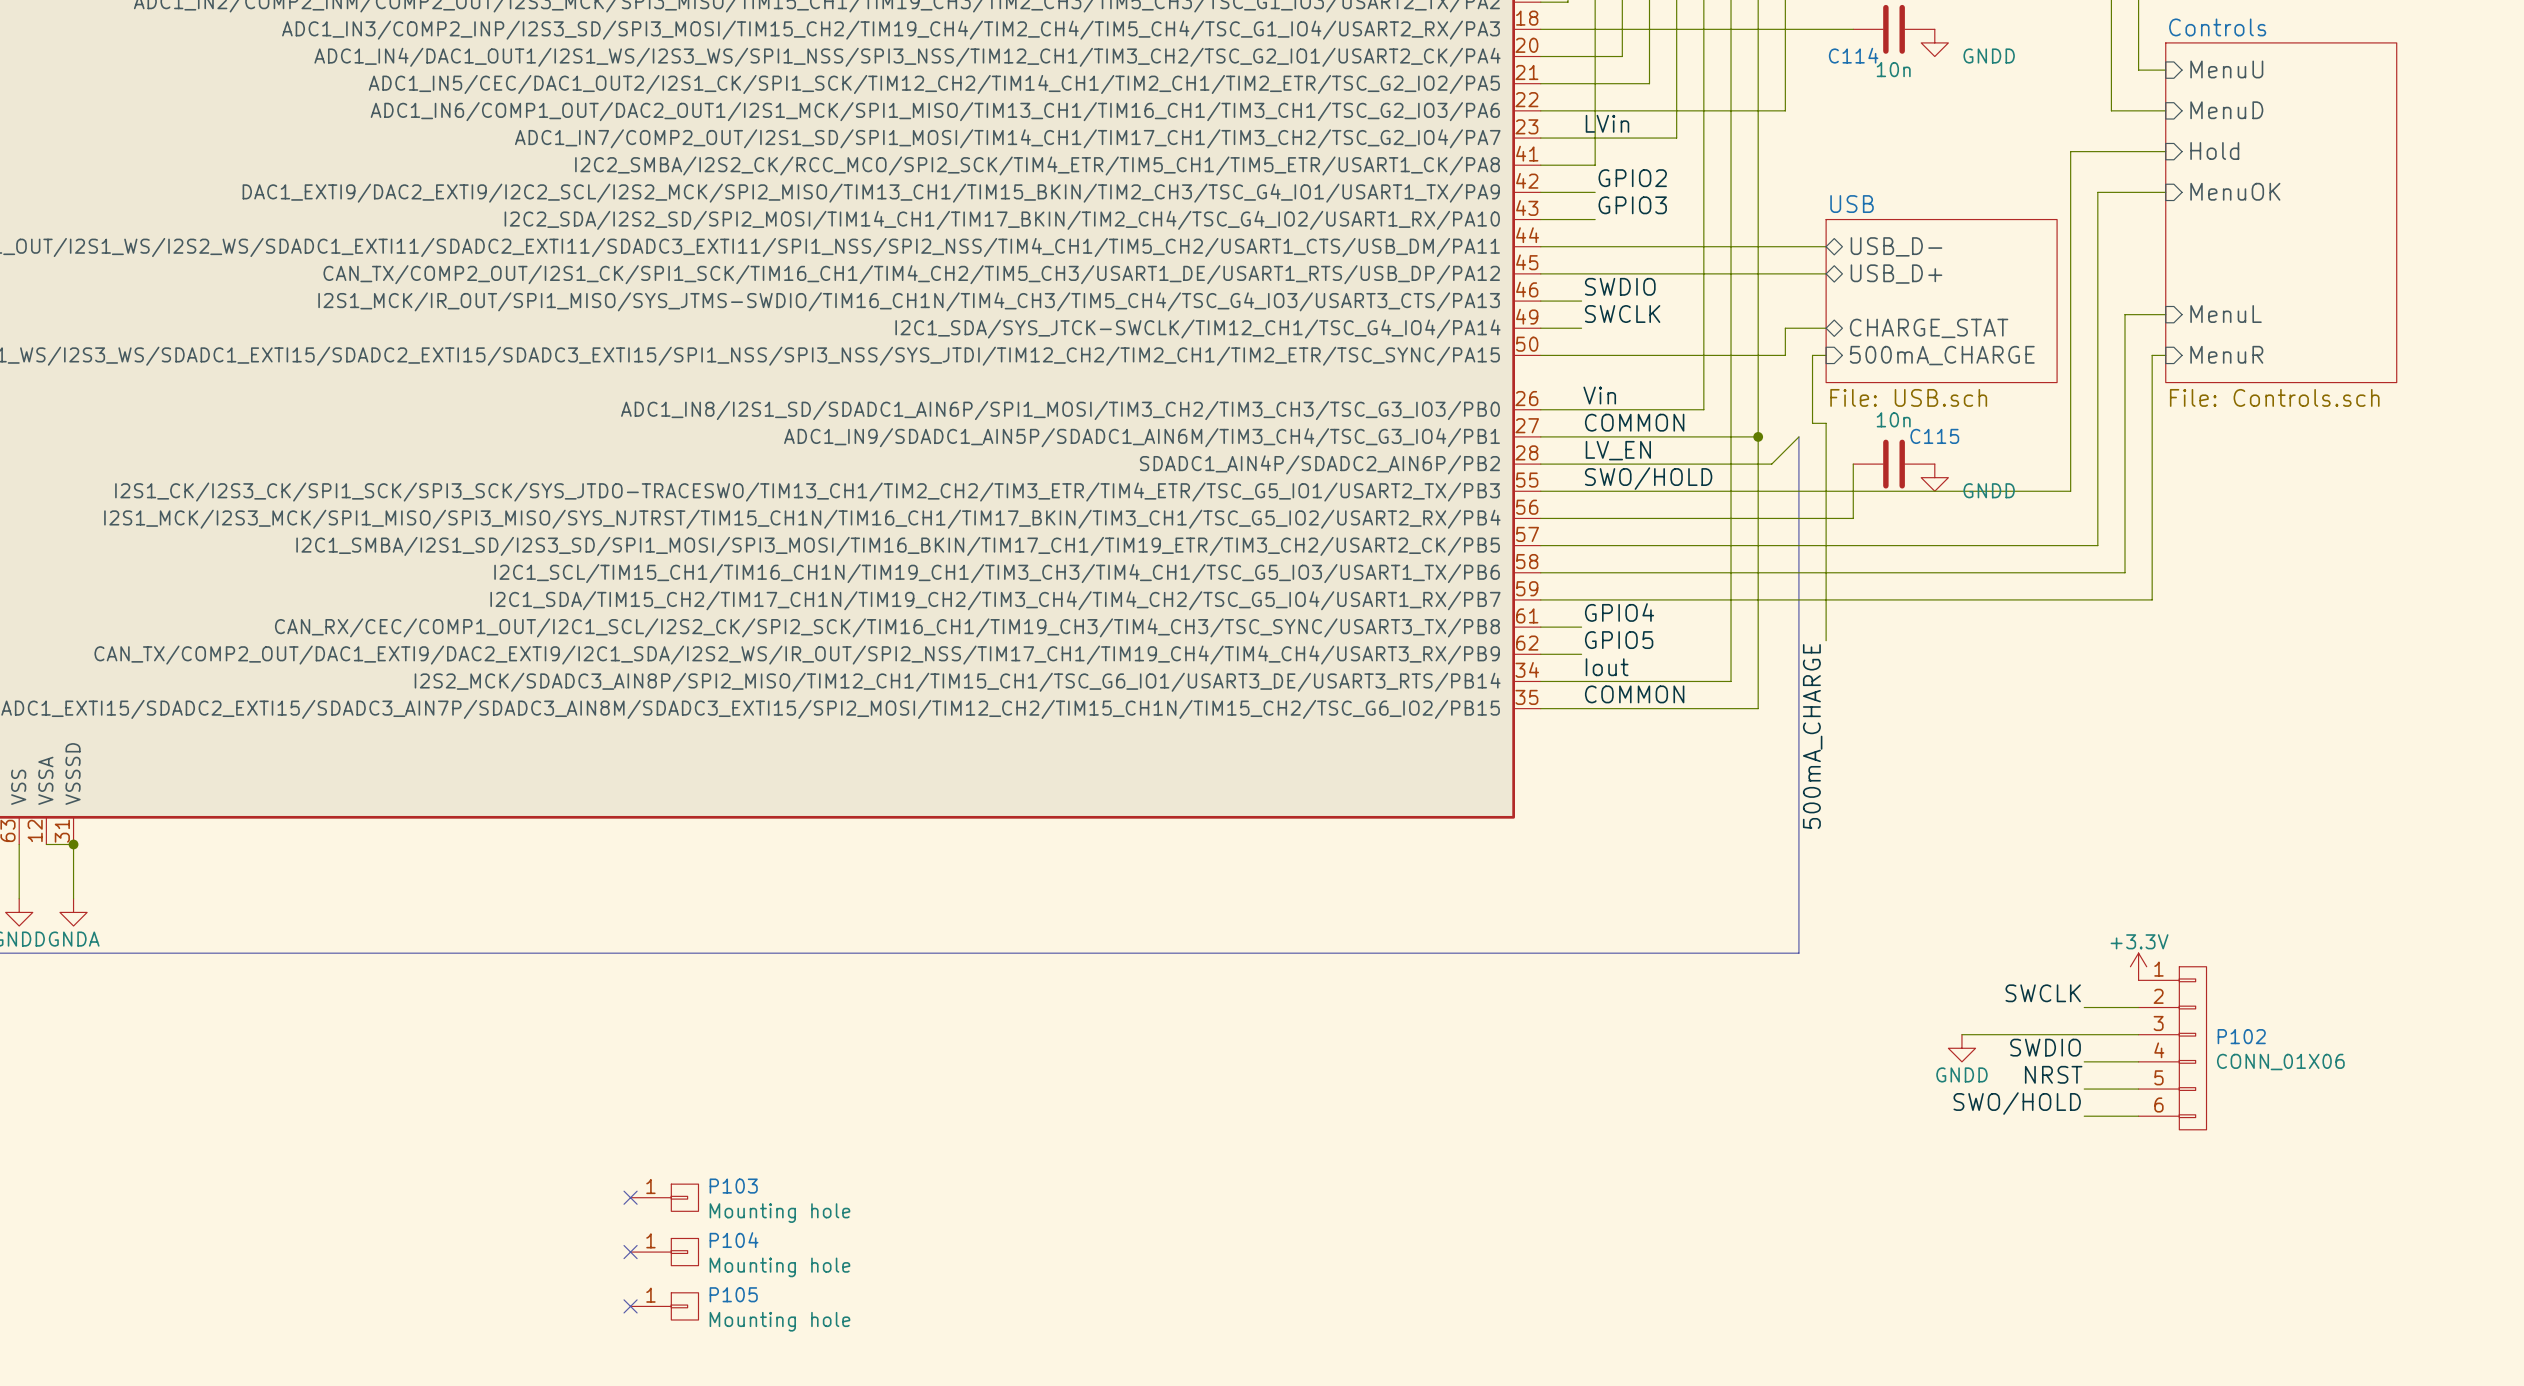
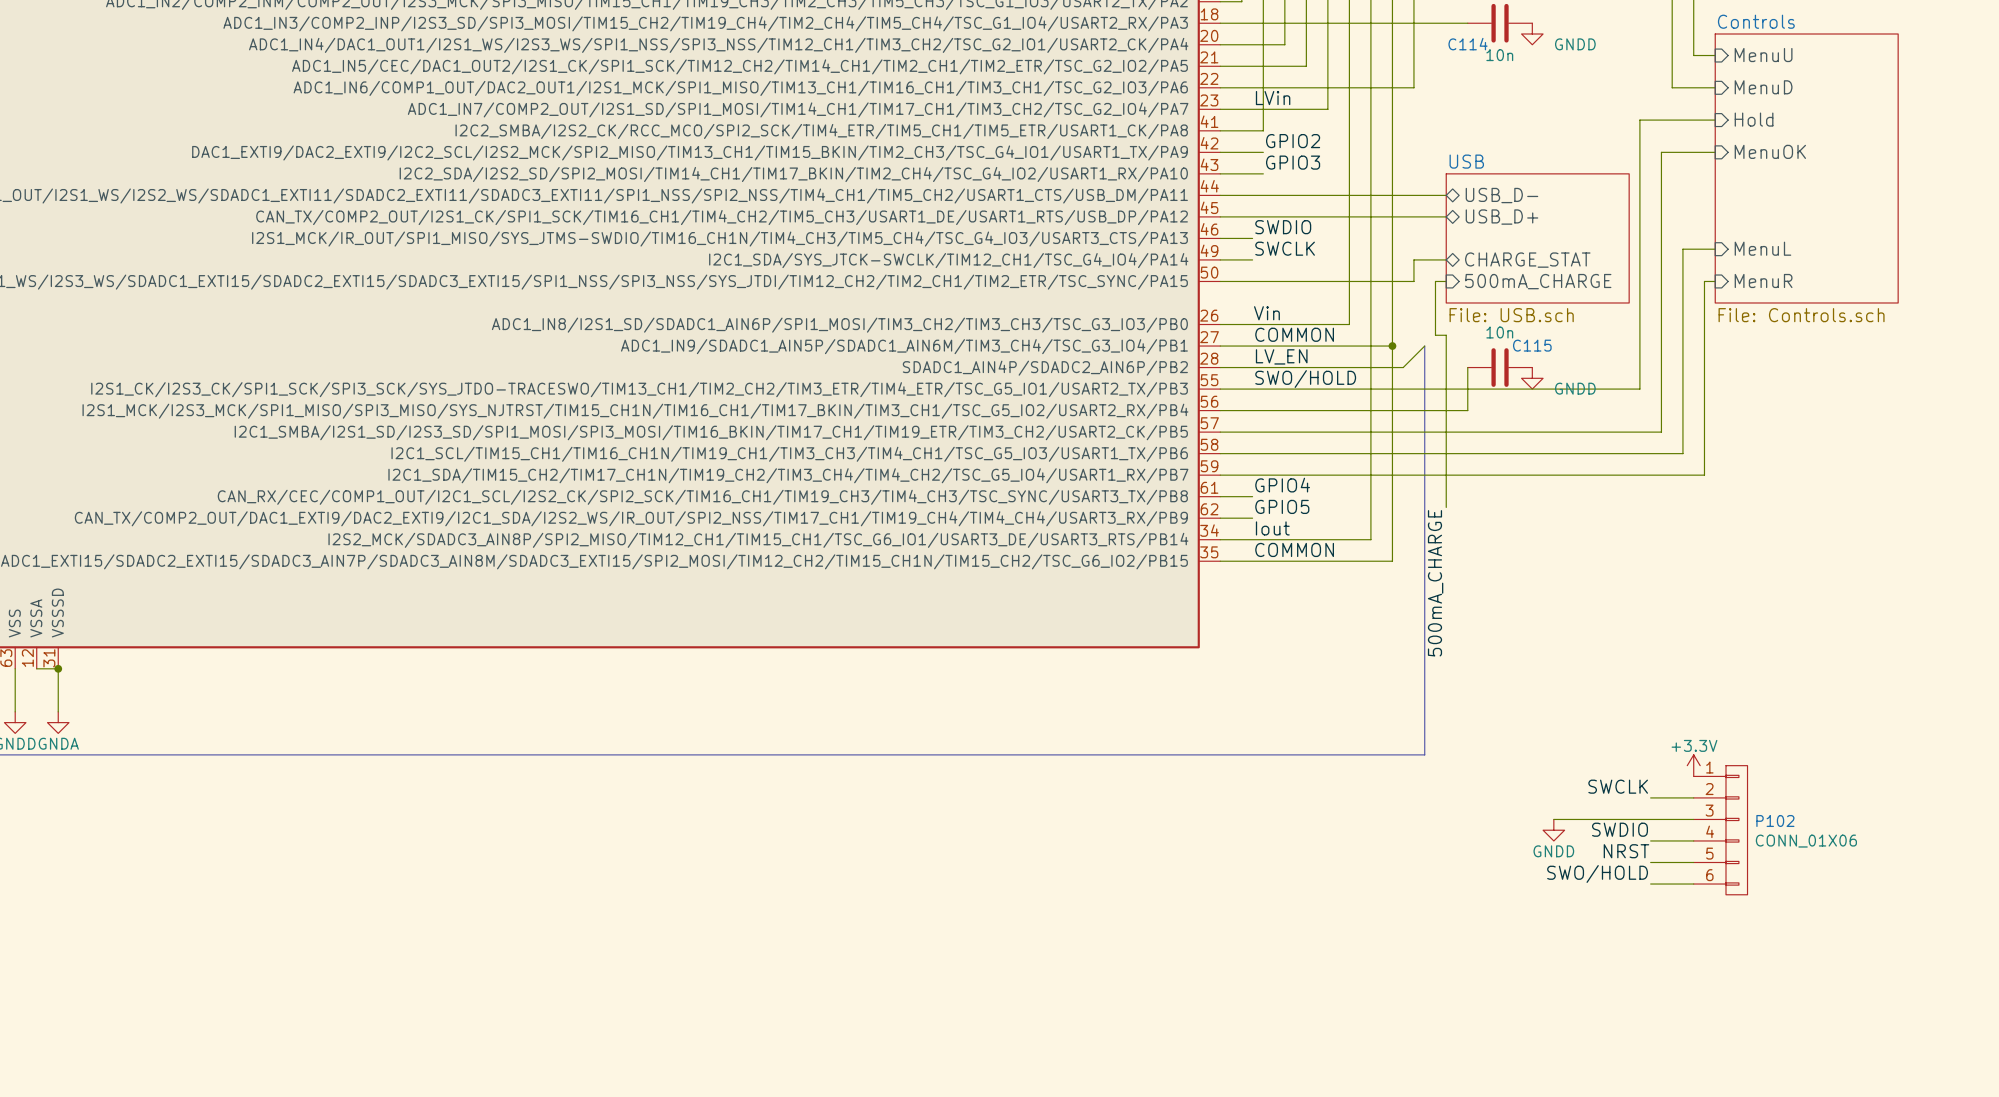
no-connect mark: (630, 1197) -> none
P103: Mounting hole (664, 1197) -> none
no-connect mark: (630, 1252) -> none
P104: Mounting hole (664, 1252) -> none
no-connect mark: (630, 1306) -> none
P105: Mounting hole (664, 1306) -> none

